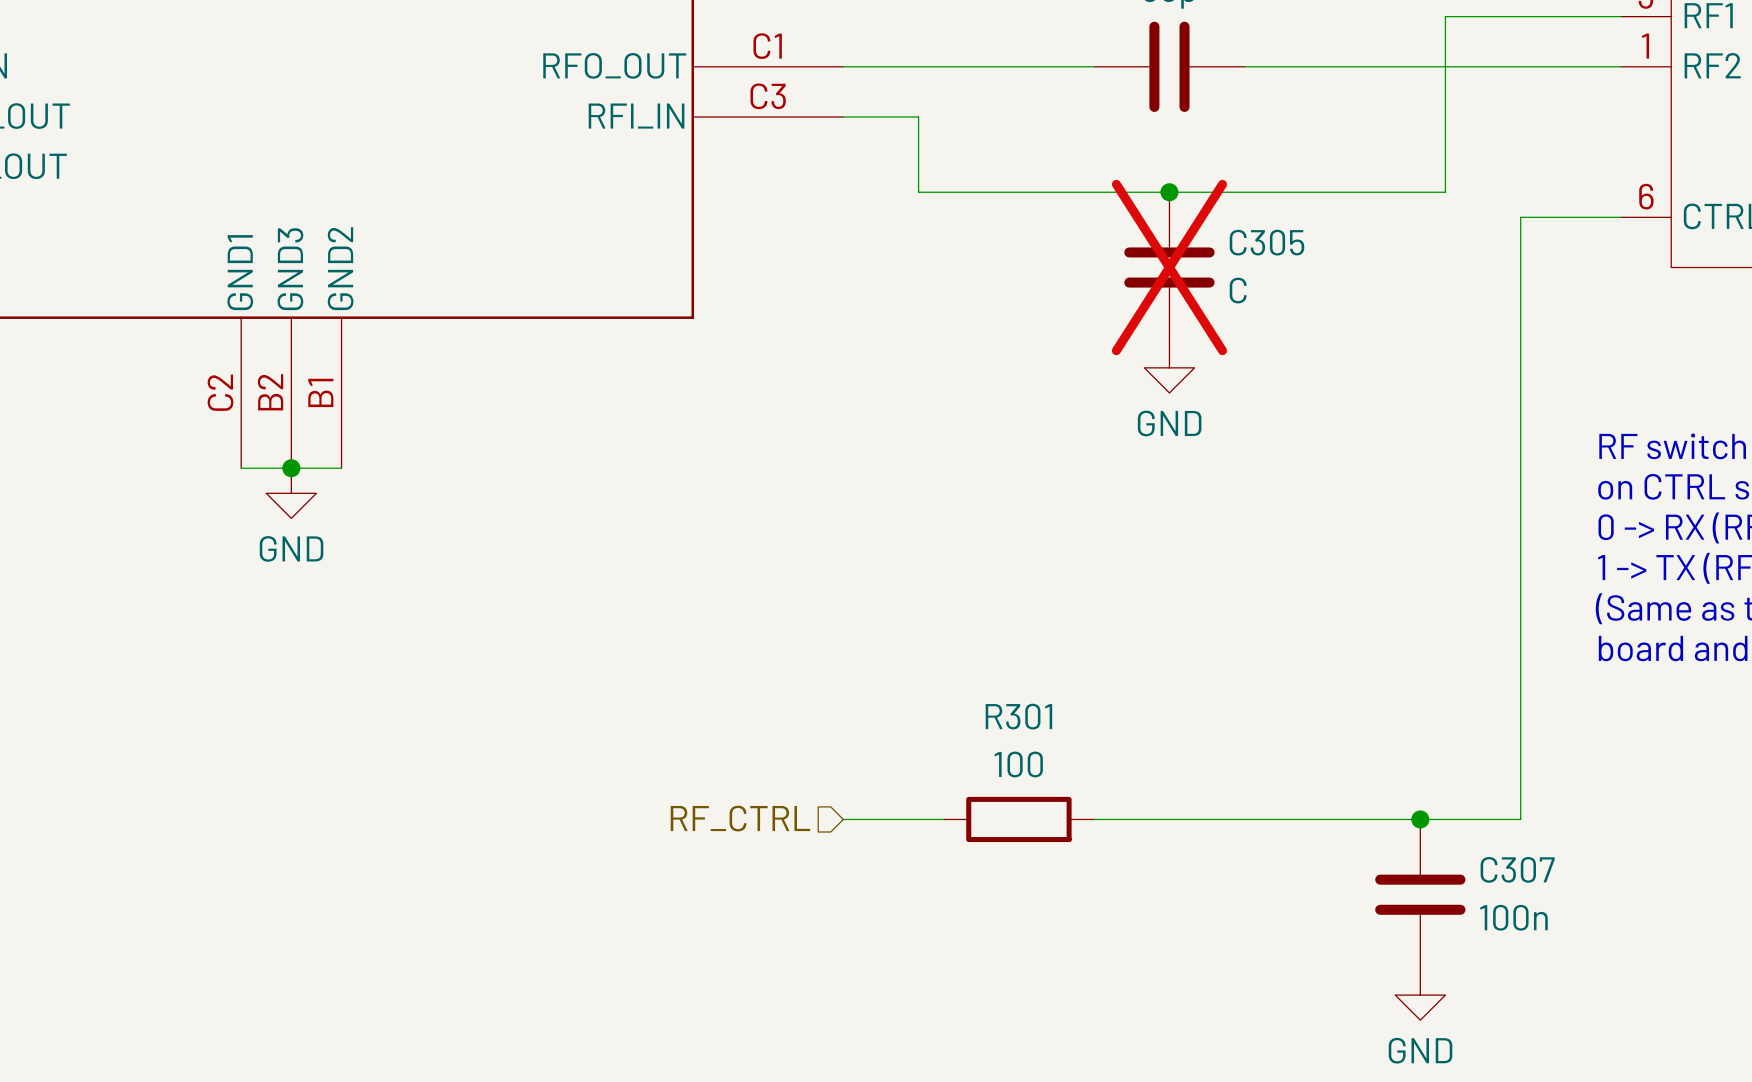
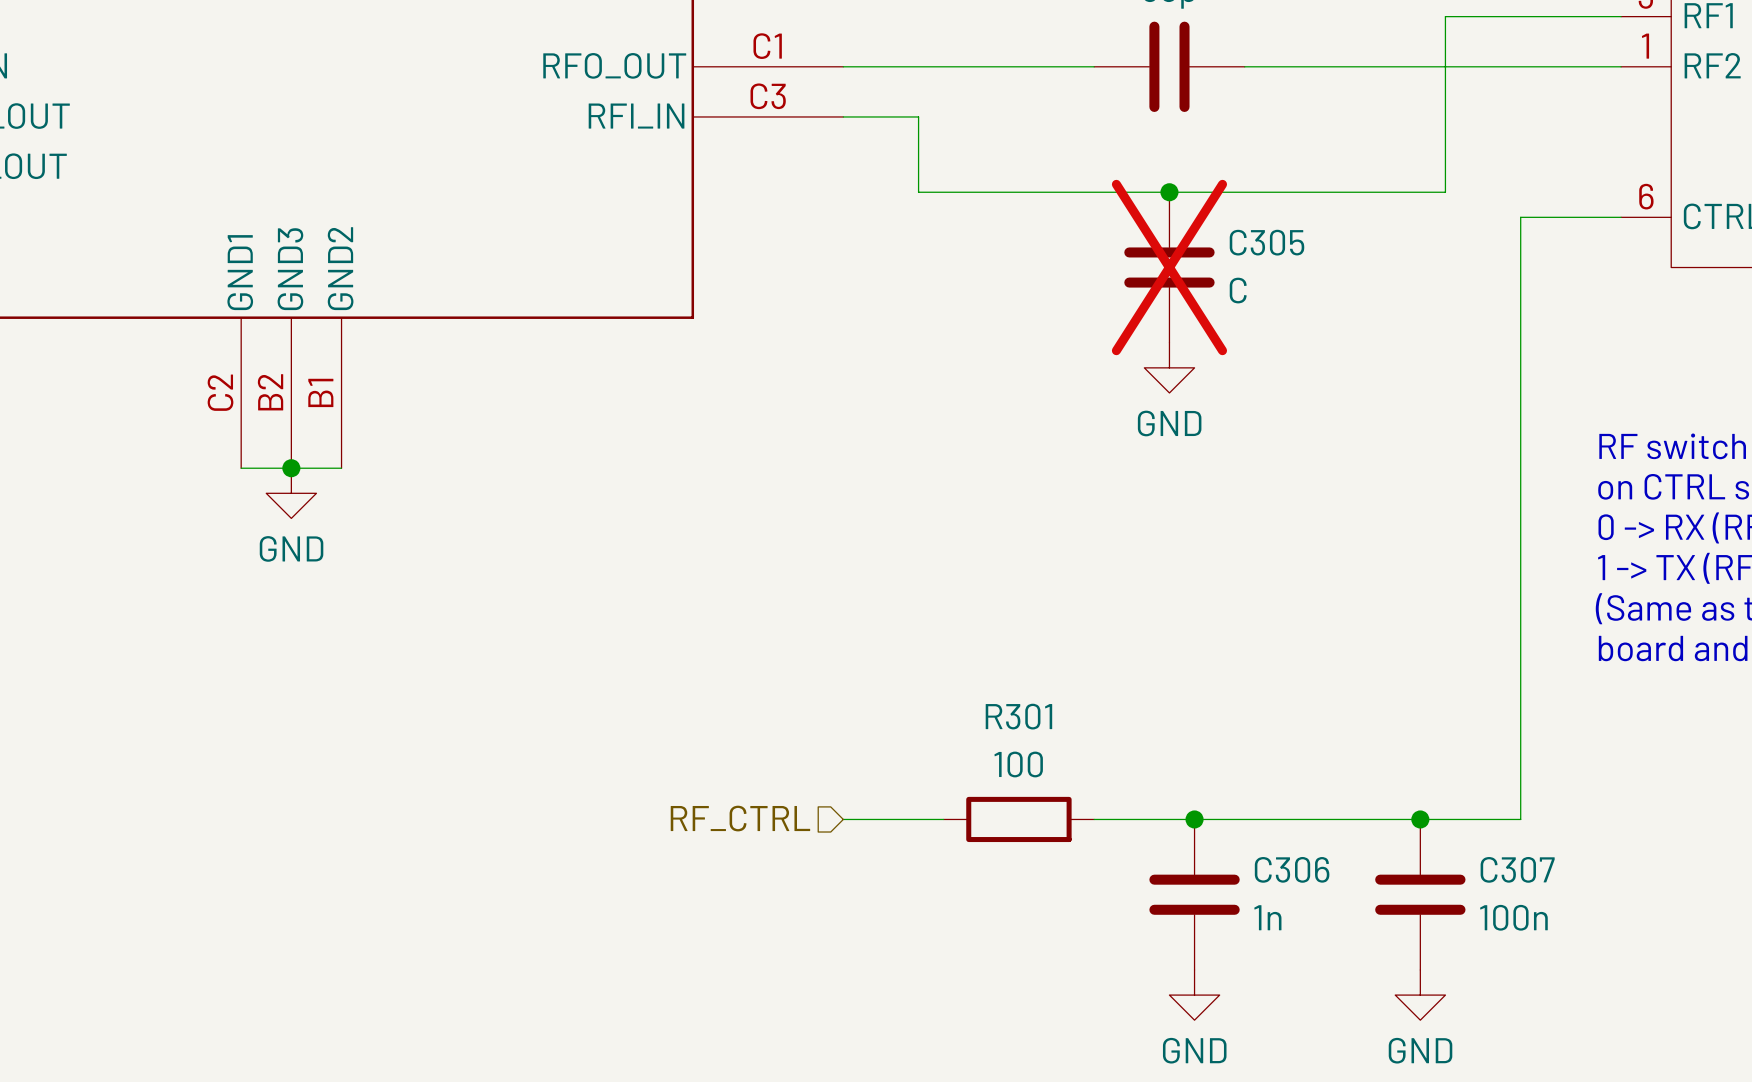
junction: none -> (1194, 819)
C306: none -> 1n (1194, 894)
power symbol: none -> GND (1194, 995)

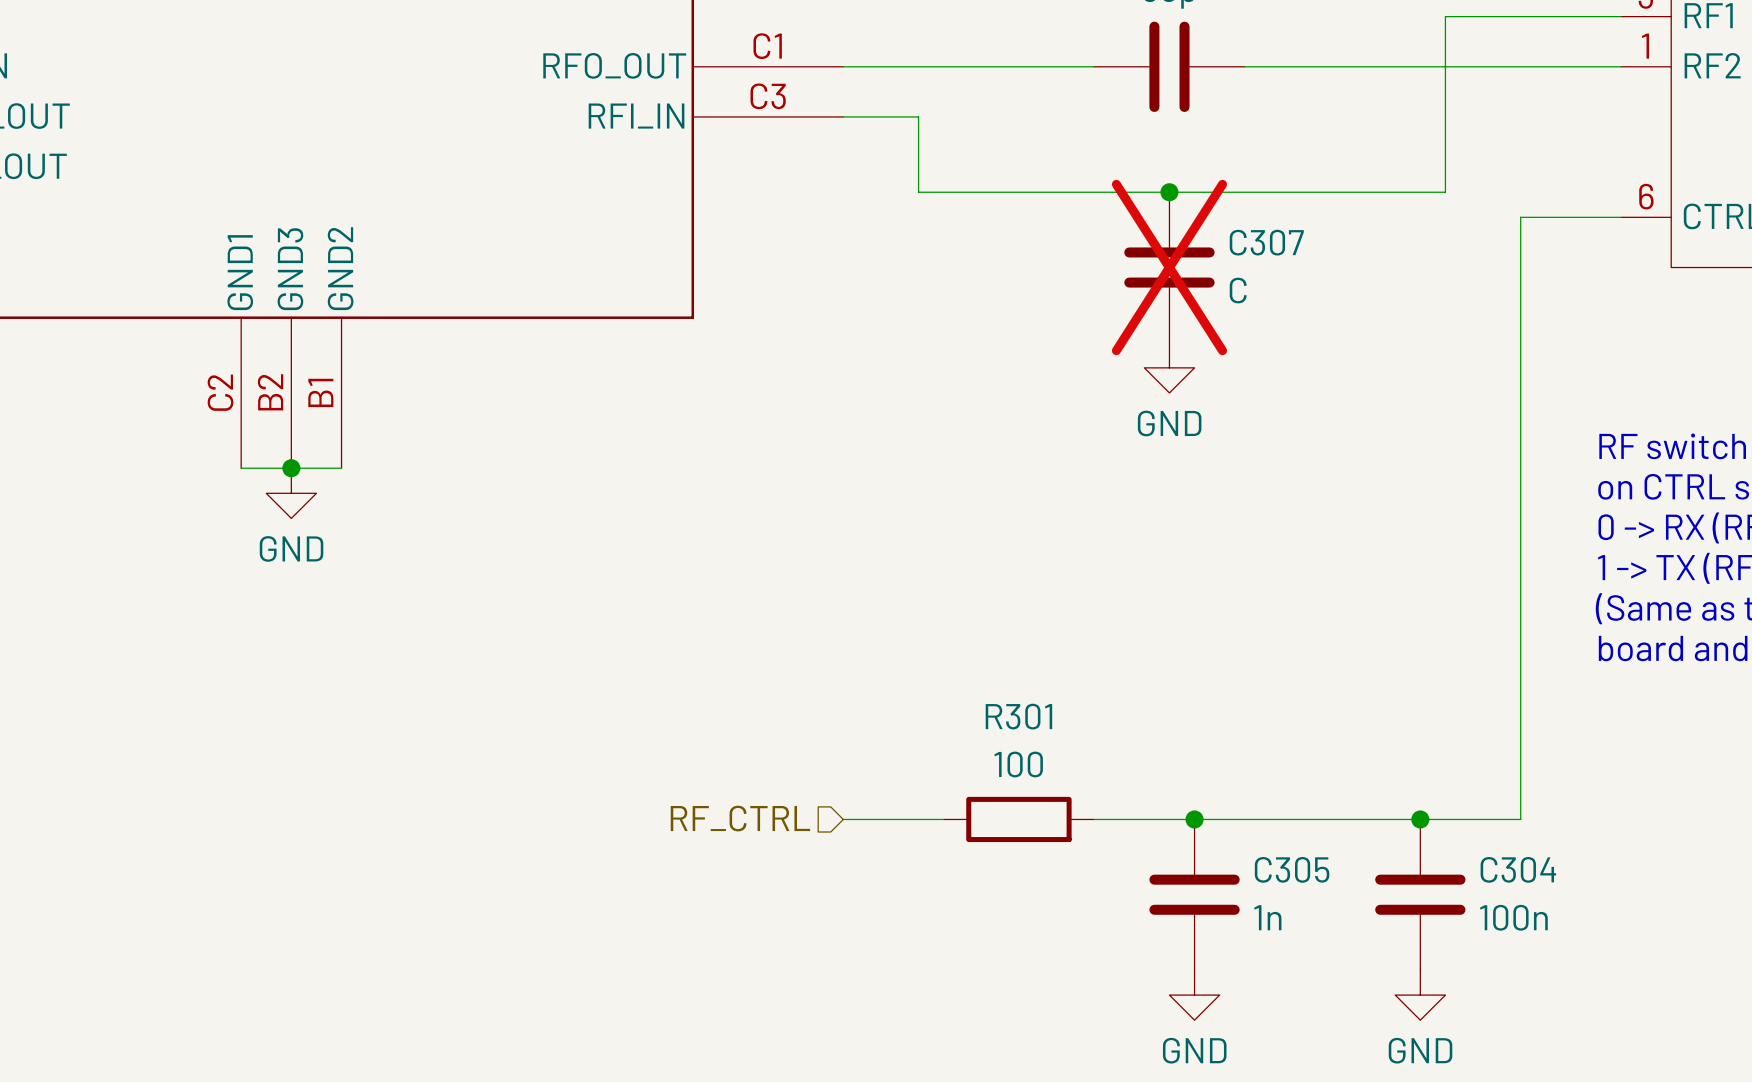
C305 name: C305 (1267, 242) -> C307 (1266, 242)
C306 name: C306 (1292, 869) -> C305 (1292, 869)
C307 name: C307 (1517, 869) -> C304 (1518, 869)

